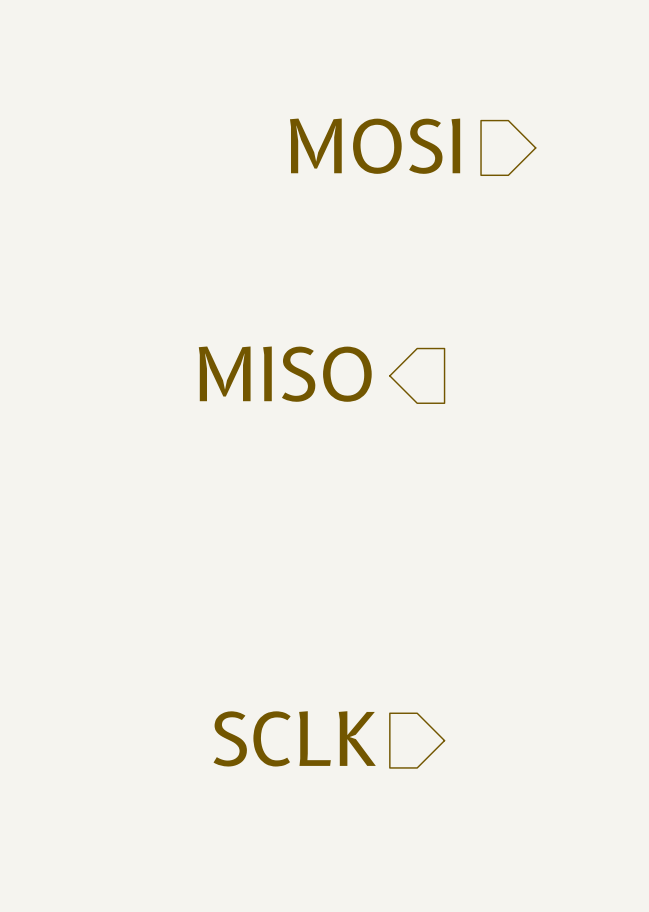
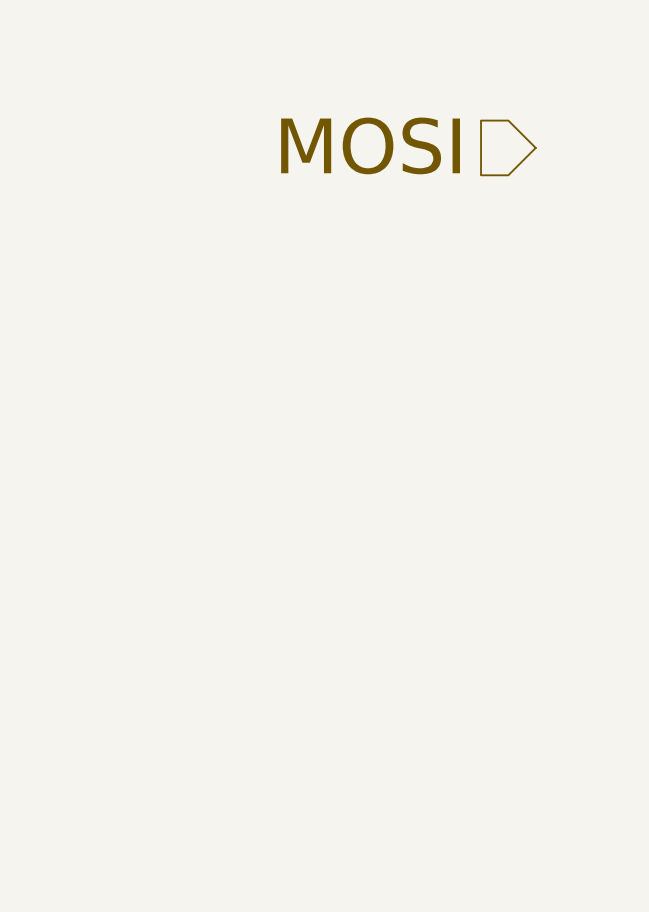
hierarchical label: MISO (285, 374) -> none
hierarchical label: SCLK (294, 738) -> none

